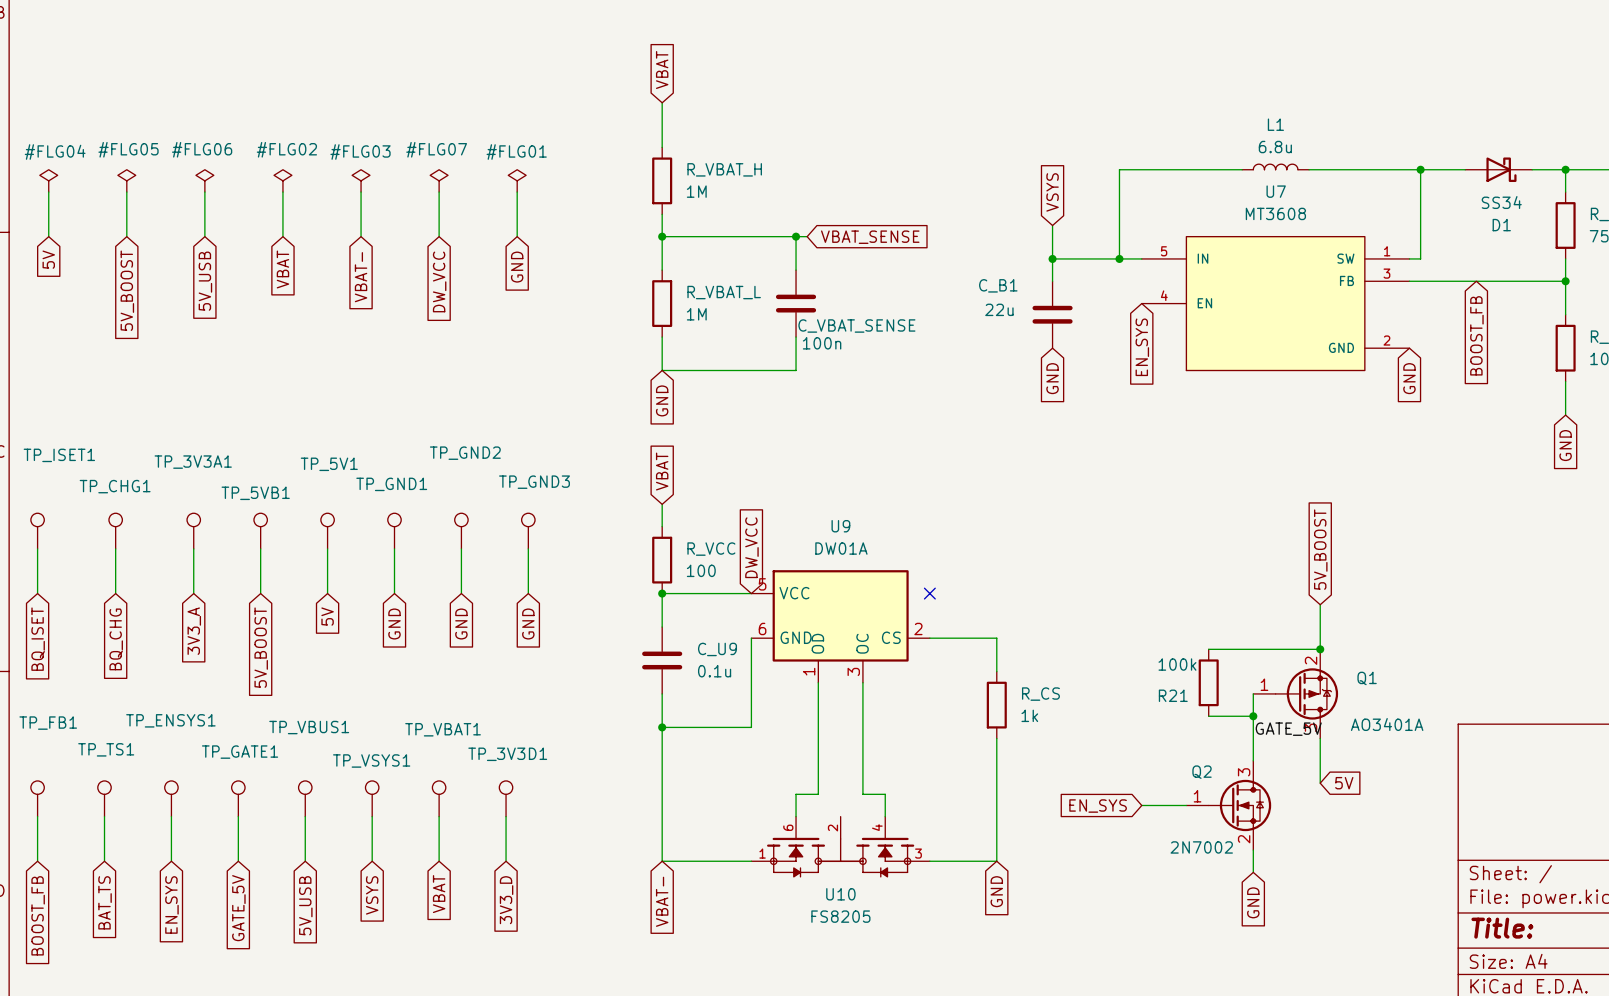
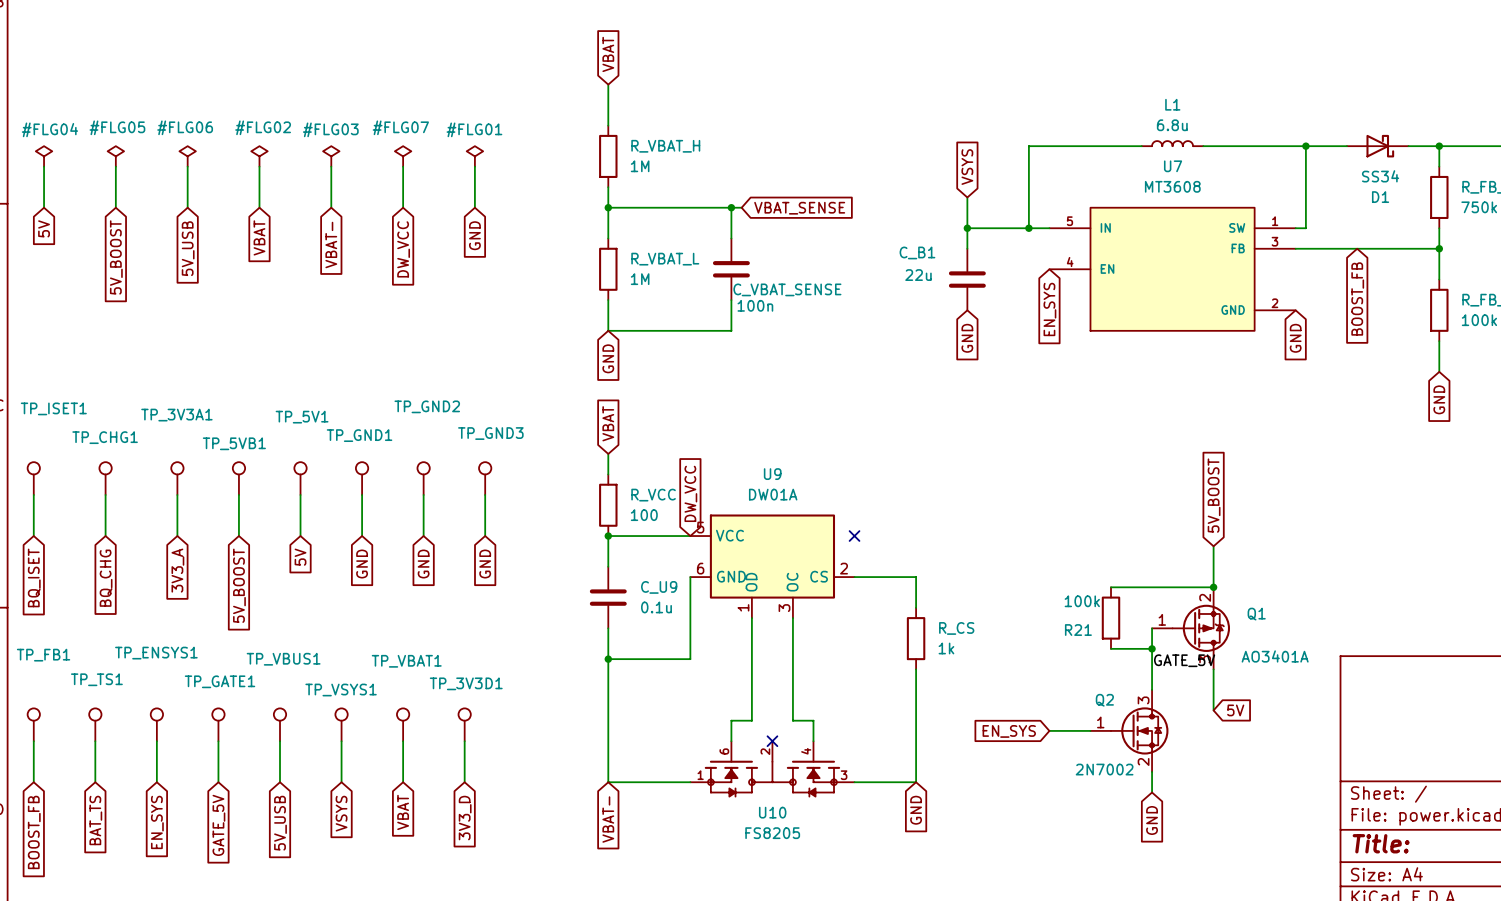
no-connect mark: none -> (772, 741)

